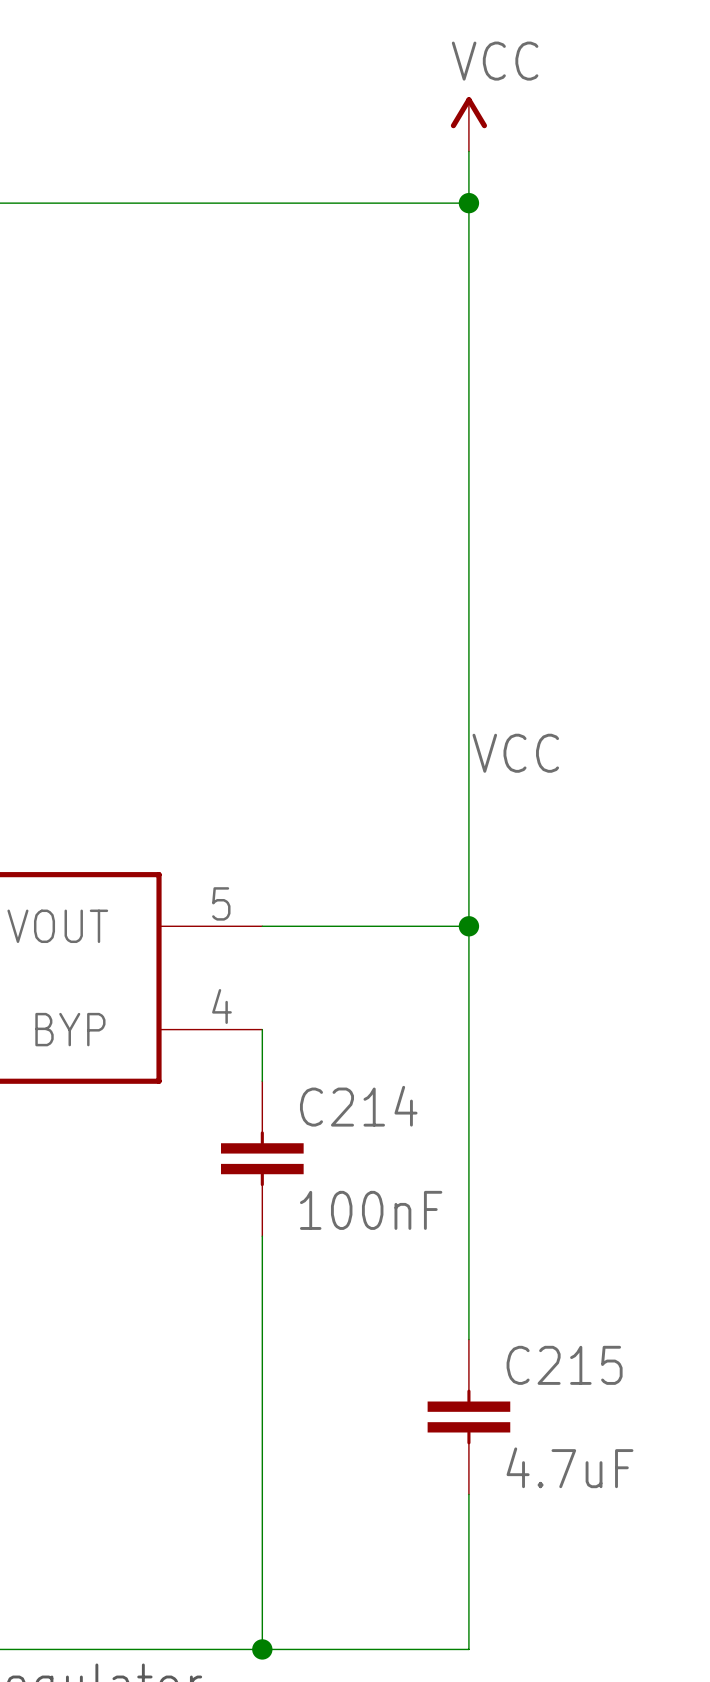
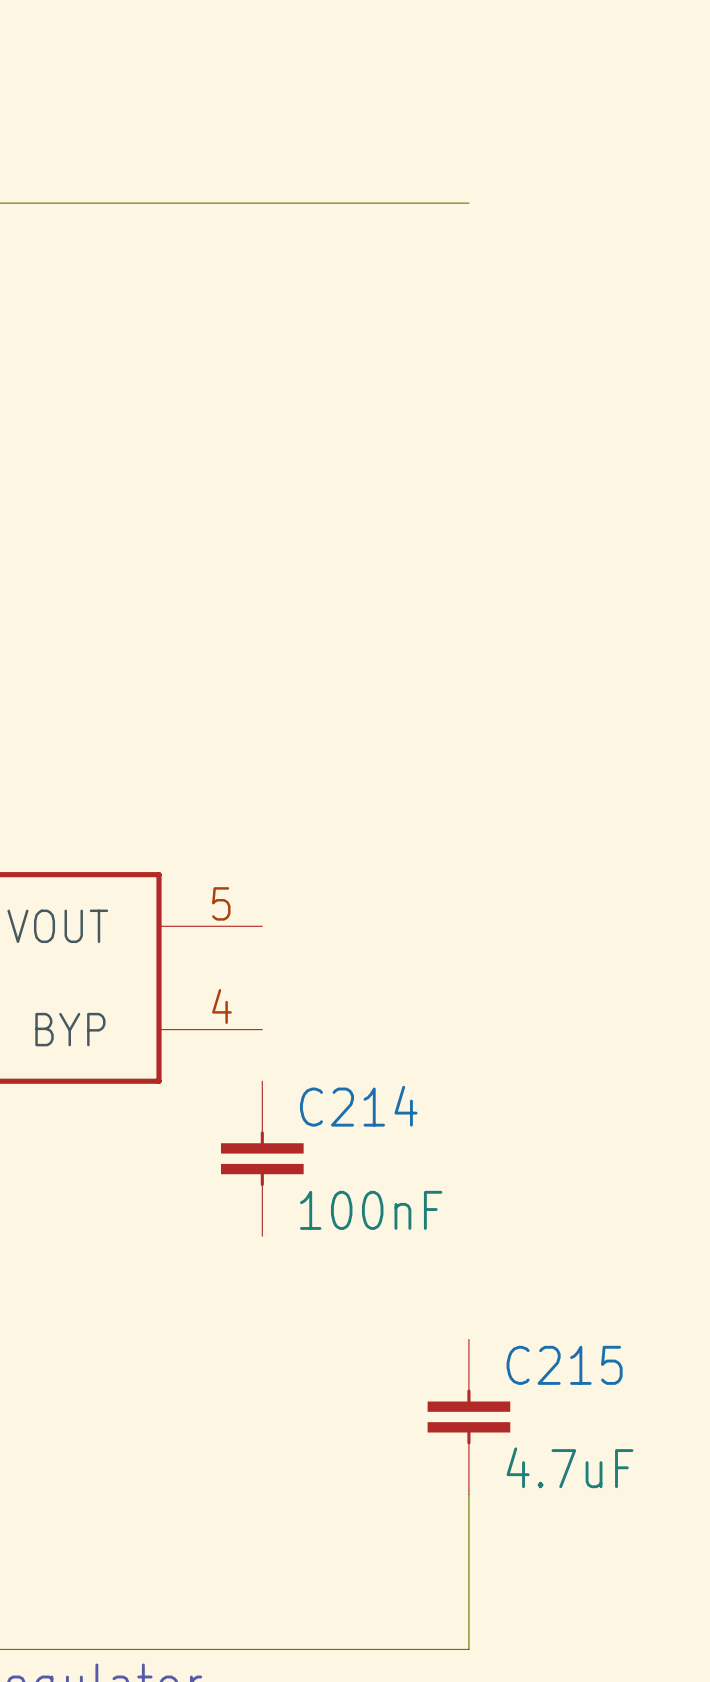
power symbol: VCC (468, 124) -> none
wire: (468, 151) (468, 1339) -> none
junction: (468, 203) -> none
label: VCC (515, 753) -> none
wire: (262, 926) (468, 926) -> none
junction: (468, 926) -> none
wire: (262, 1029) (262, 1081) -> none
wire: (262, 1236) (262, 1649) -> none
junction: (262, 1649) -> none

